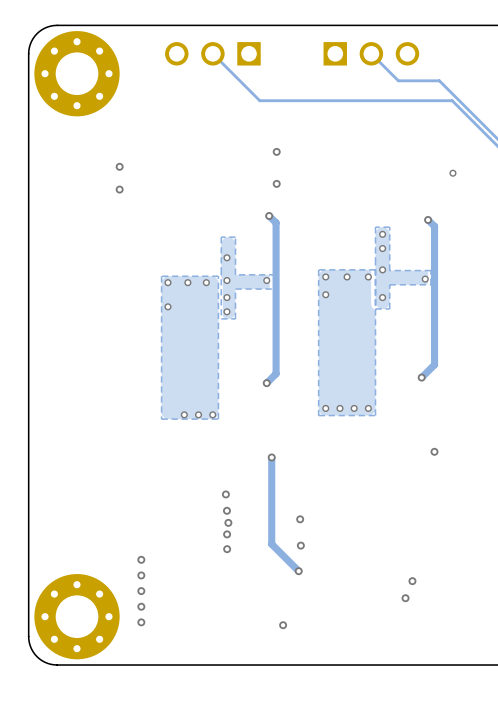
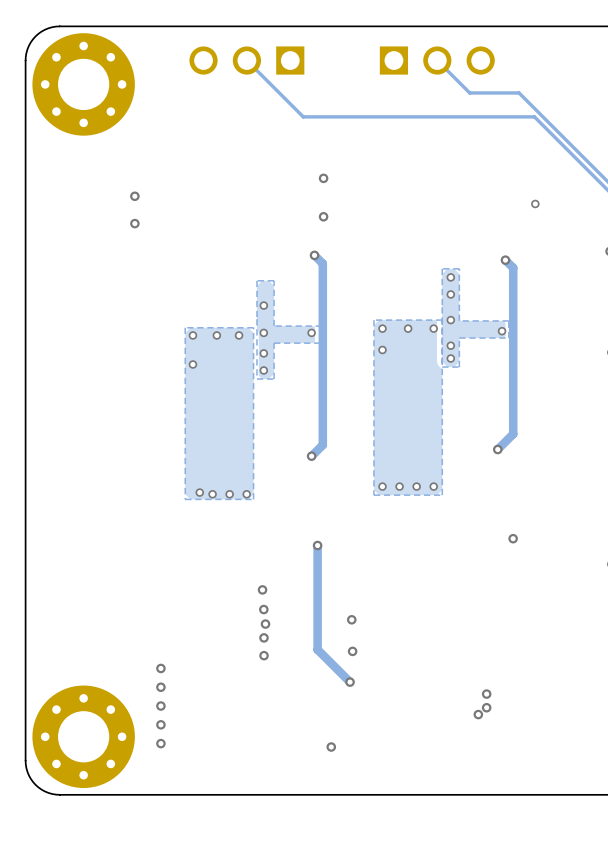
via: none -> (450, 345)
via: (382, 297) -> none
via: none -> (450, 358)
via: none -> (199, 492)
via: none -> (486, 707)

